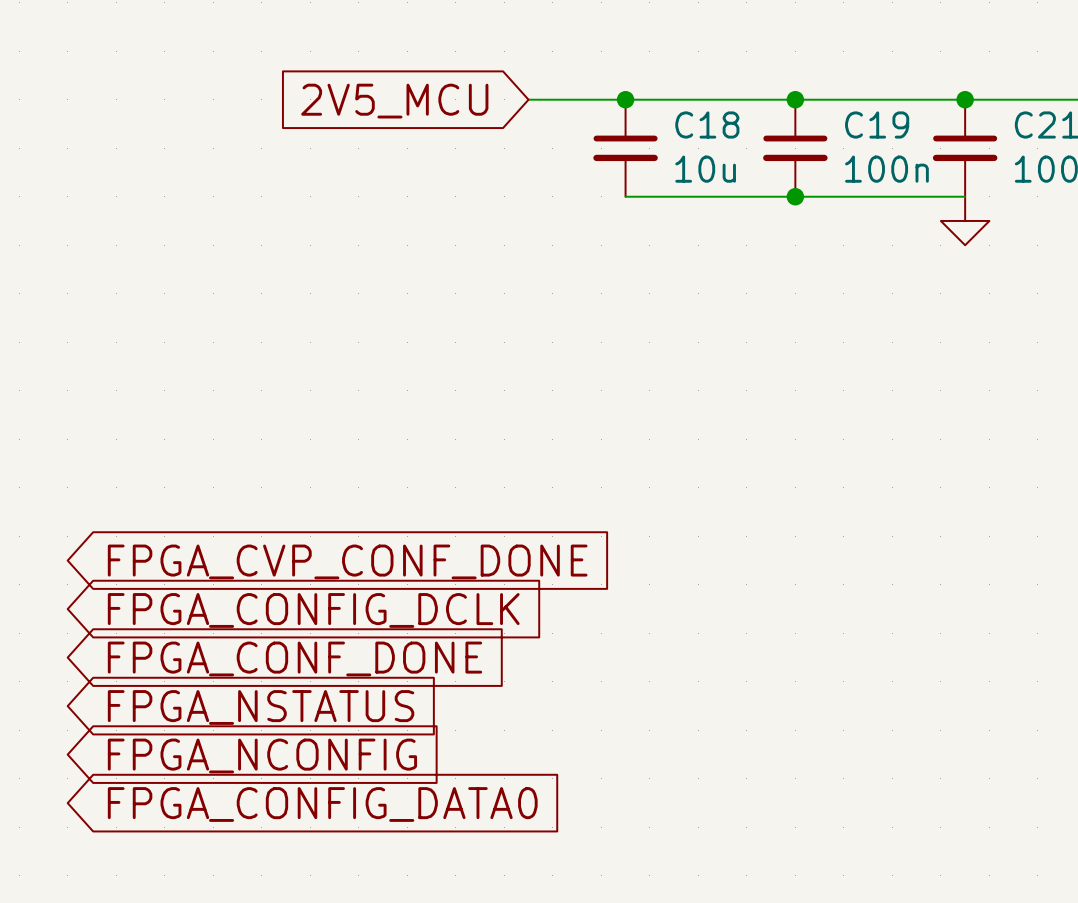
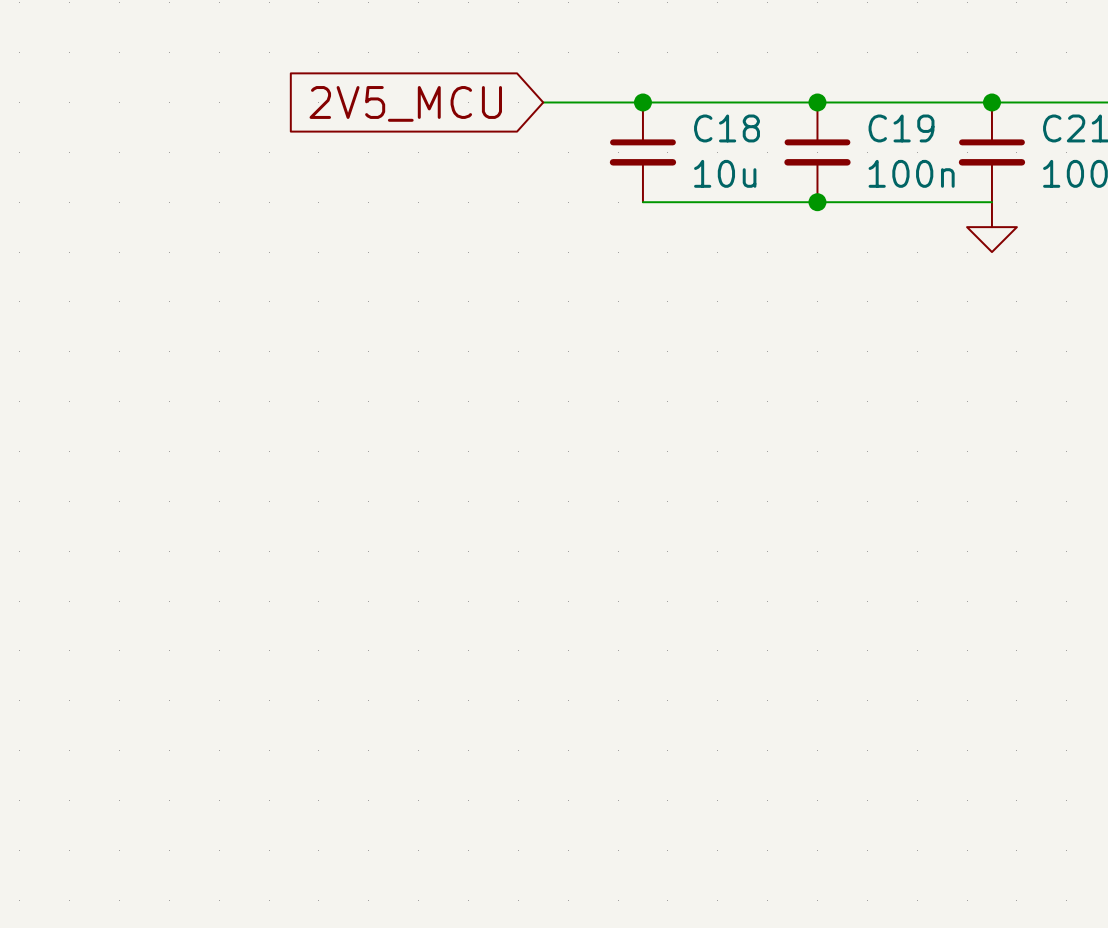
global label: FPGA_CVP_CONF_DONE (347, 561) -> none
global label: FPGA_CONFIG_DCLK (313, 610) -> none
global label: FPGA_CONF_DONE (295, 658) -> none
global label: FPGA_NSTATUS (261, 707) -> none
global label: FPGA_NCONFIG (262, 755) -> none
global label: FPGA_CONFIG_DATA0 (322, 804) -> none

